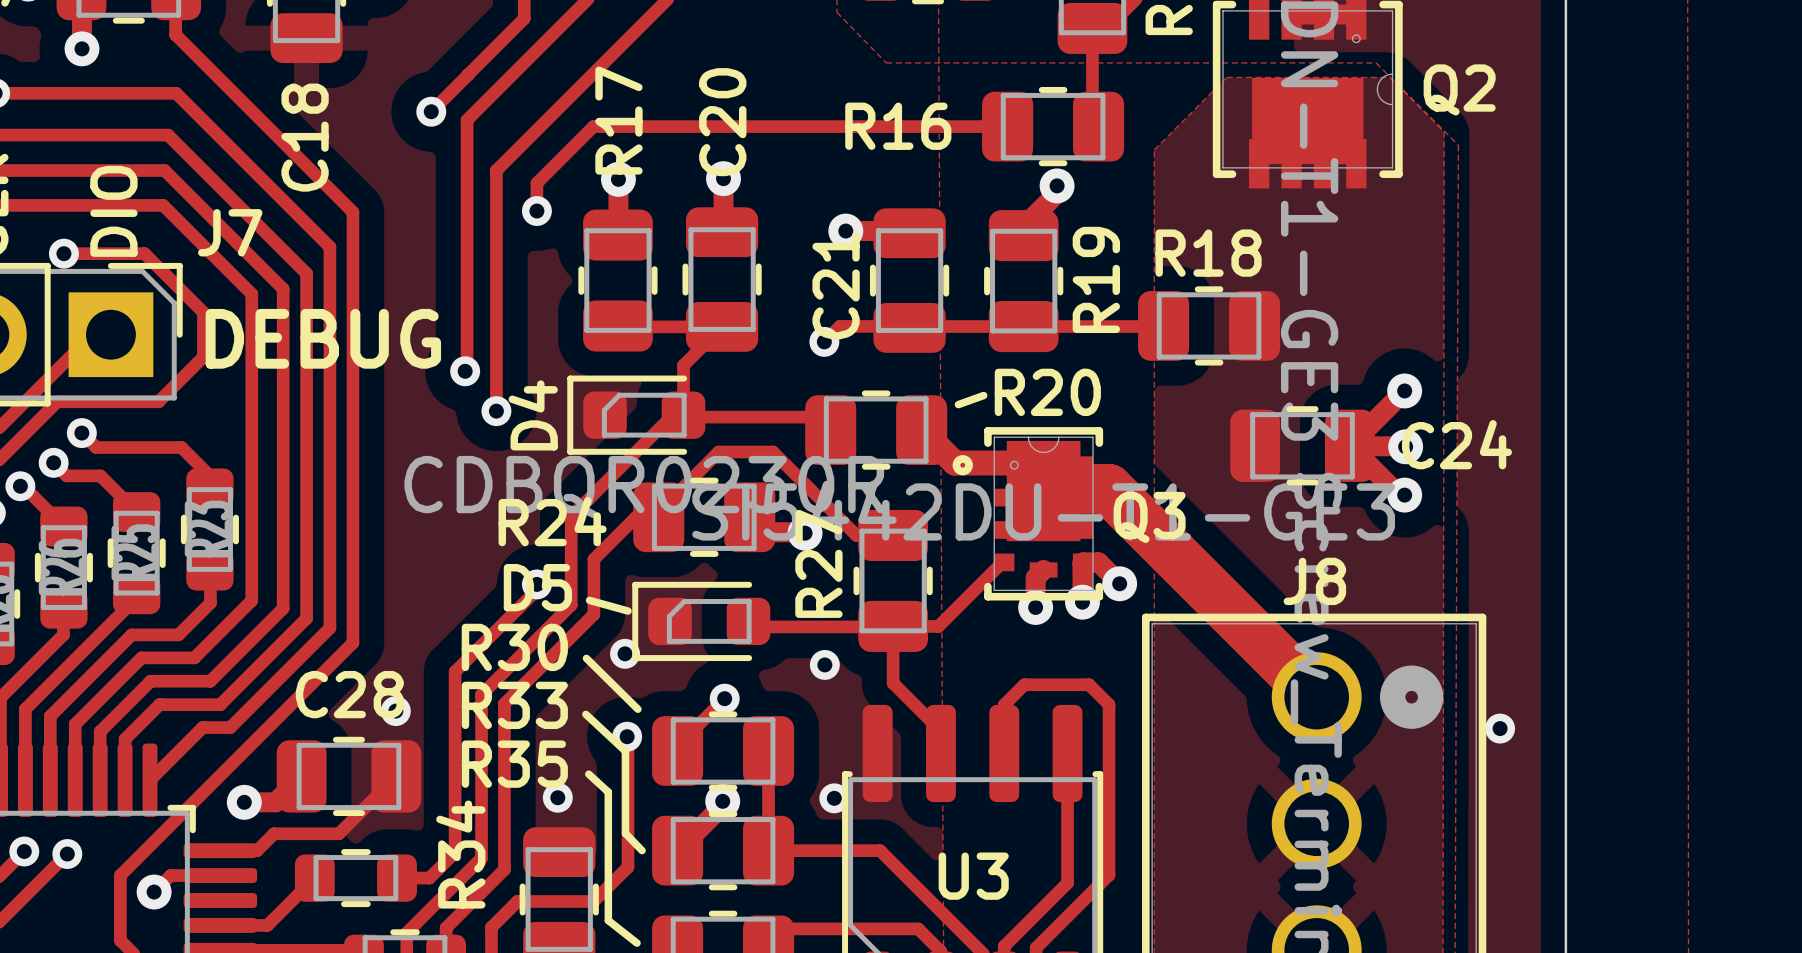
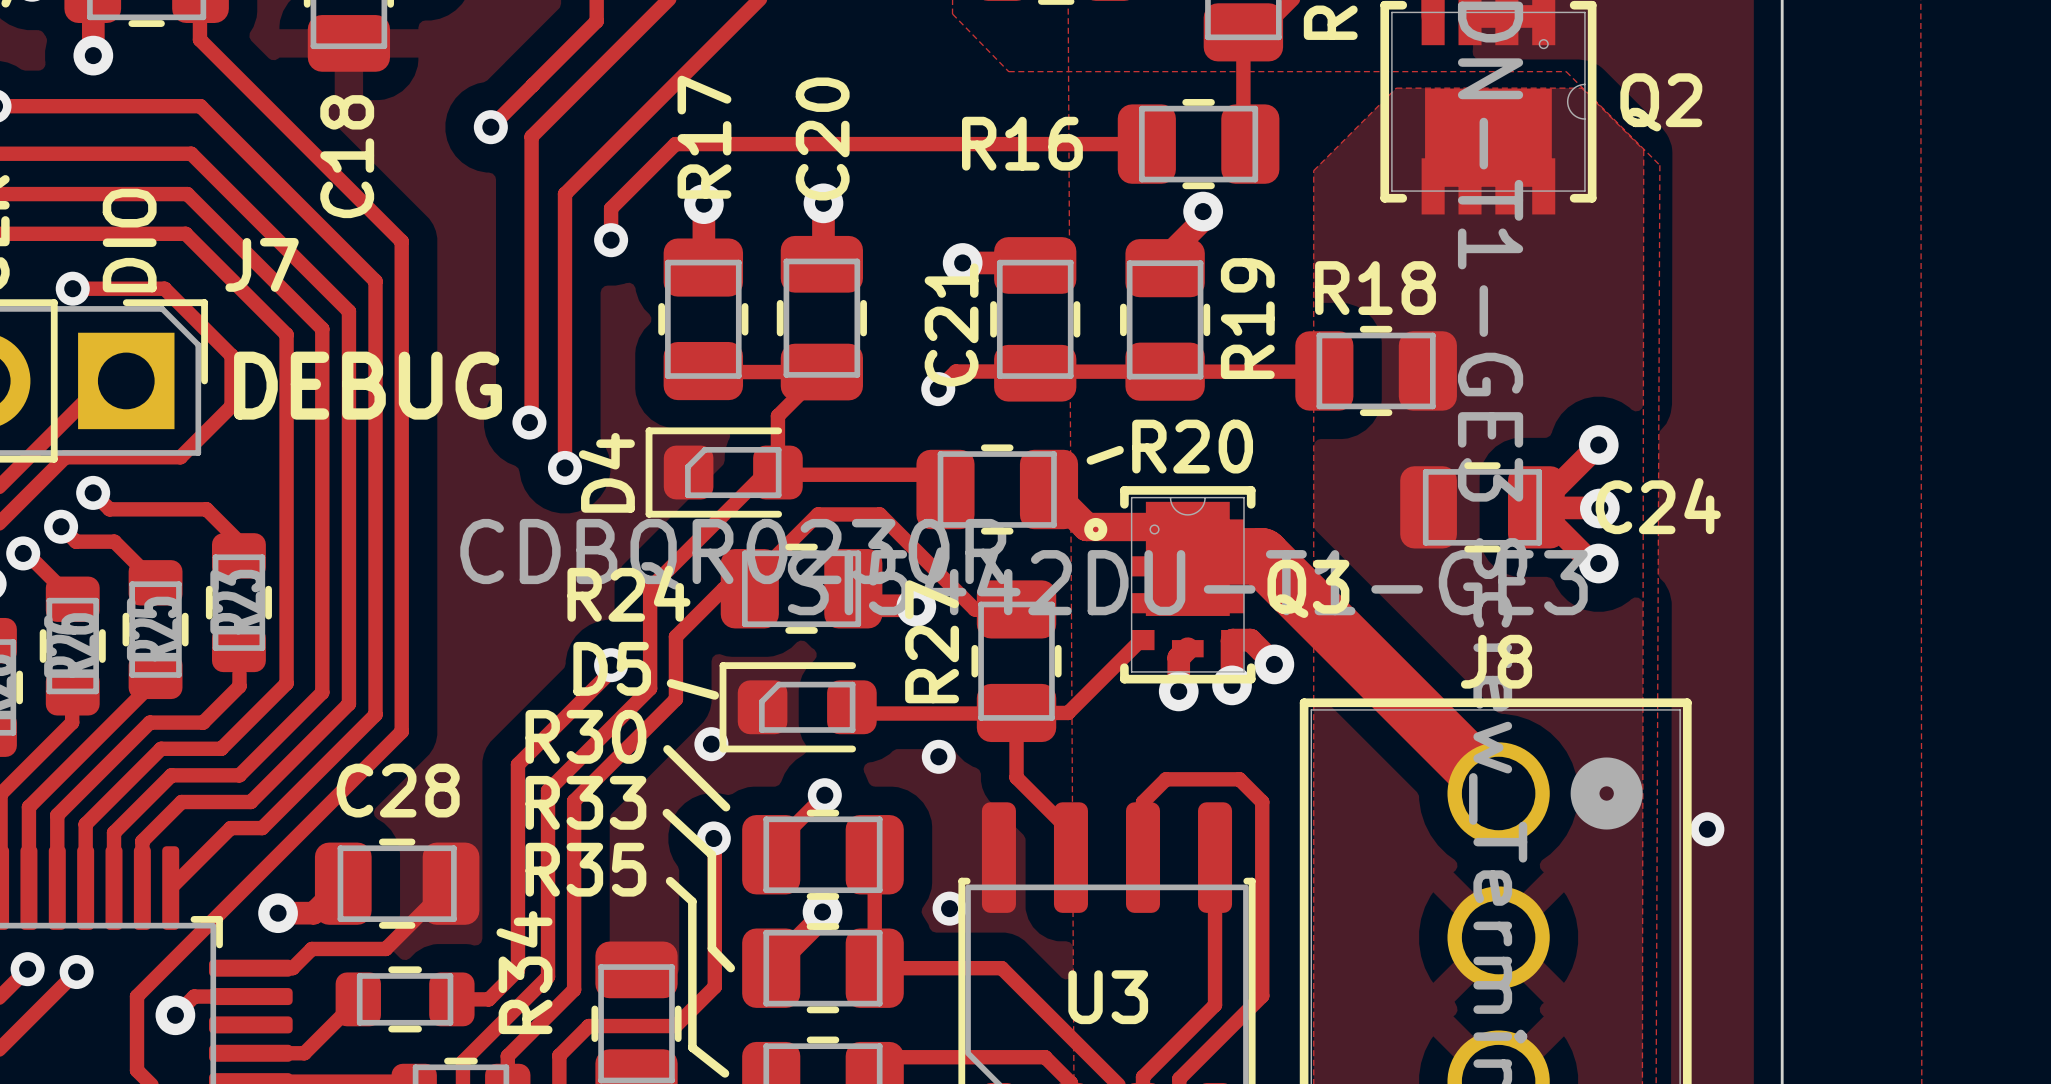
via: (395, 711) -> none
via: (557, 797) -> none

